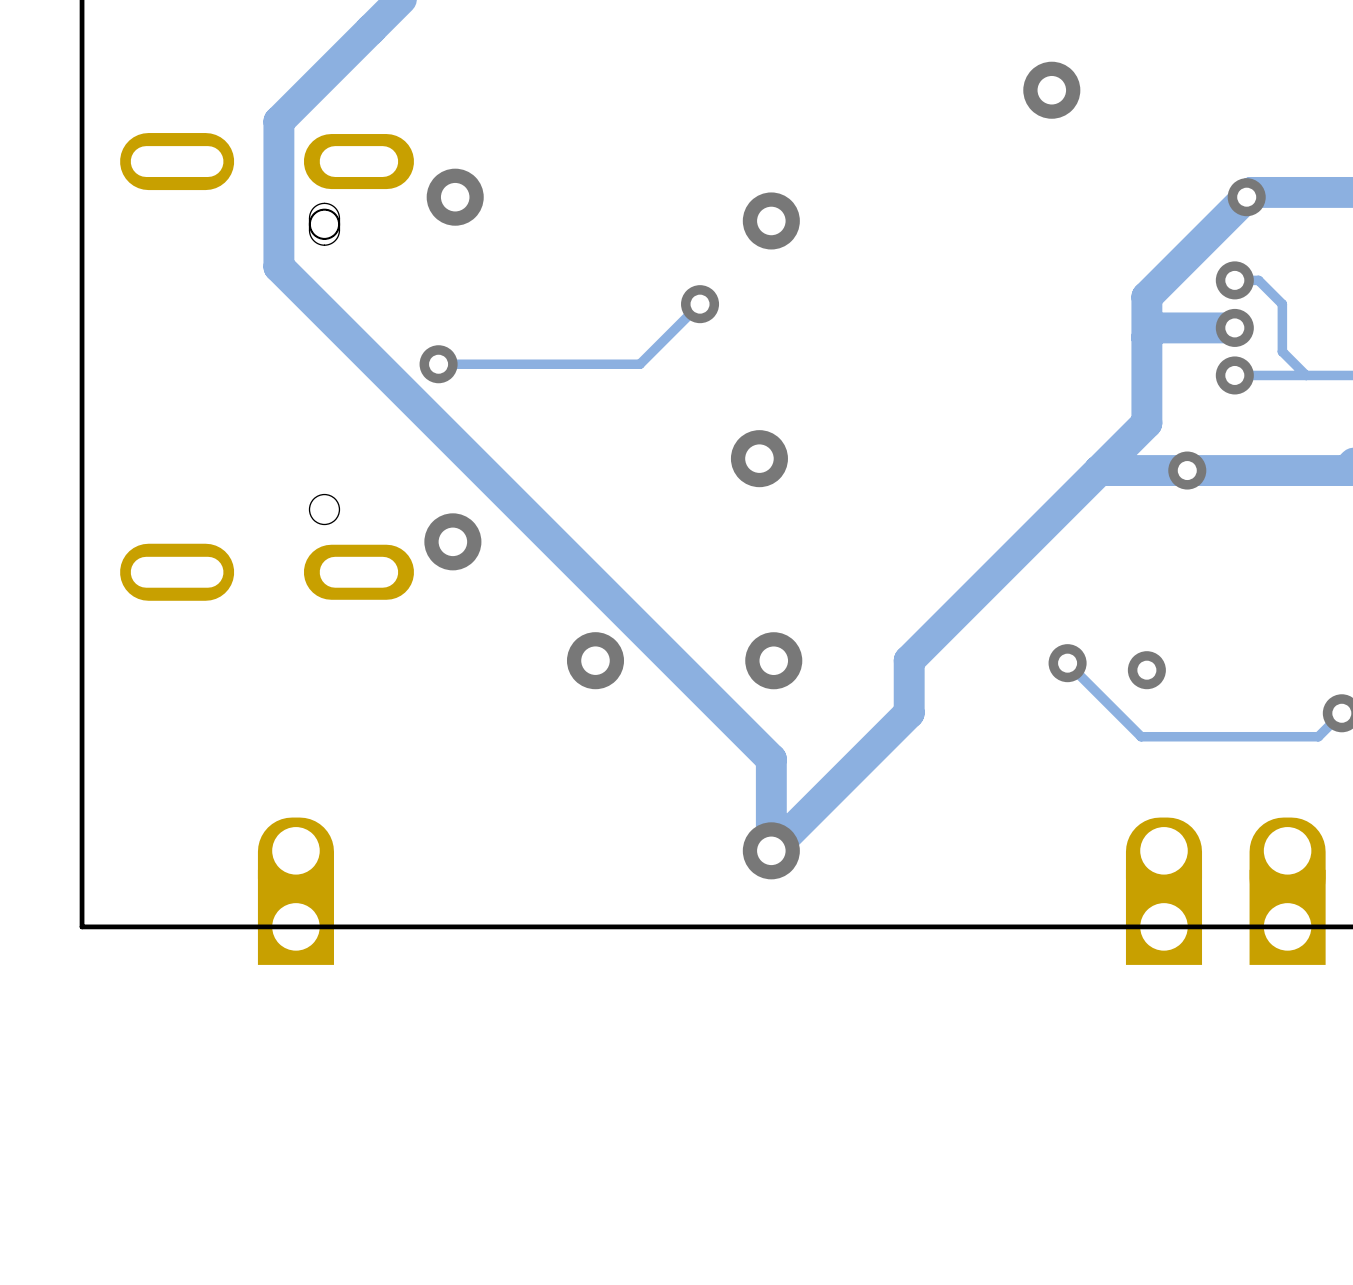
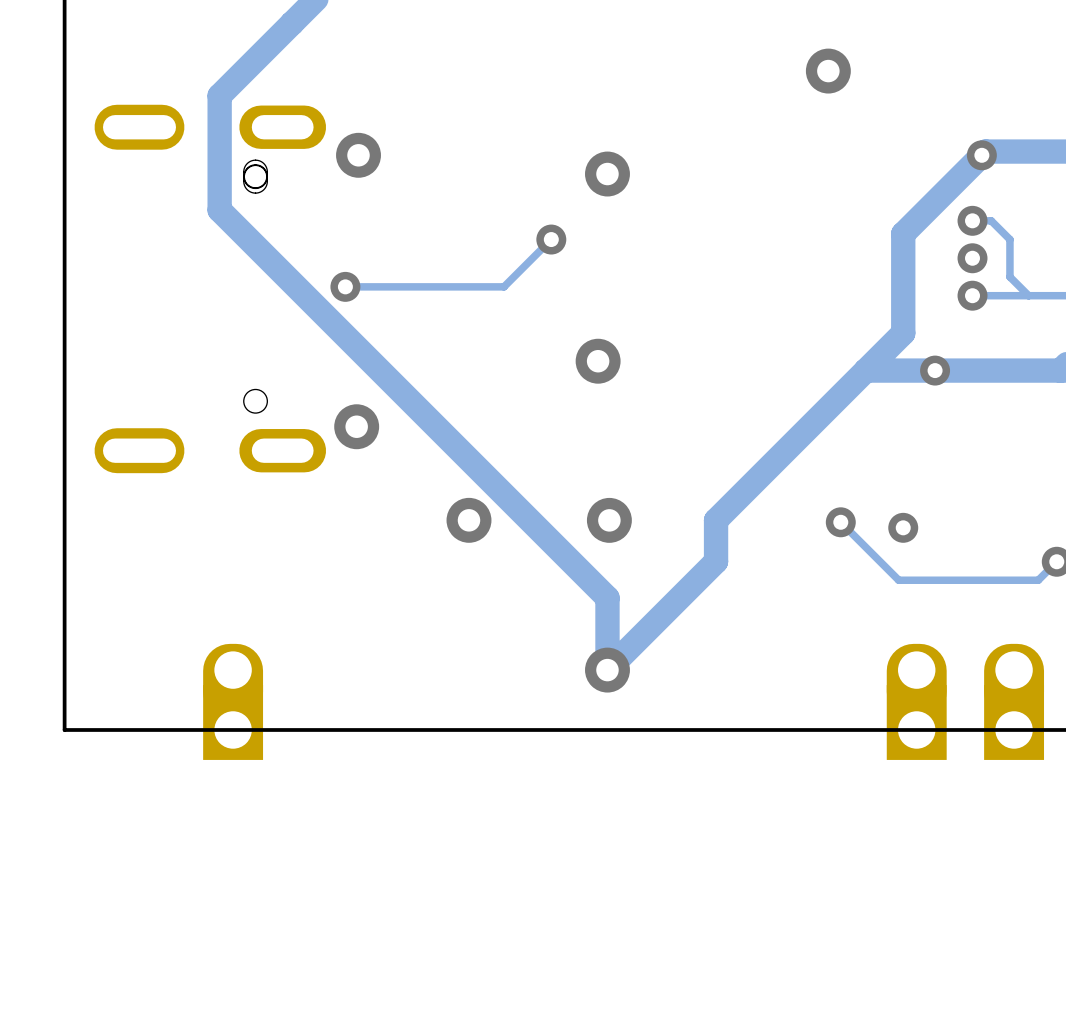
track: (1234, 327) (1156, 327) (1146, 337) -> none

